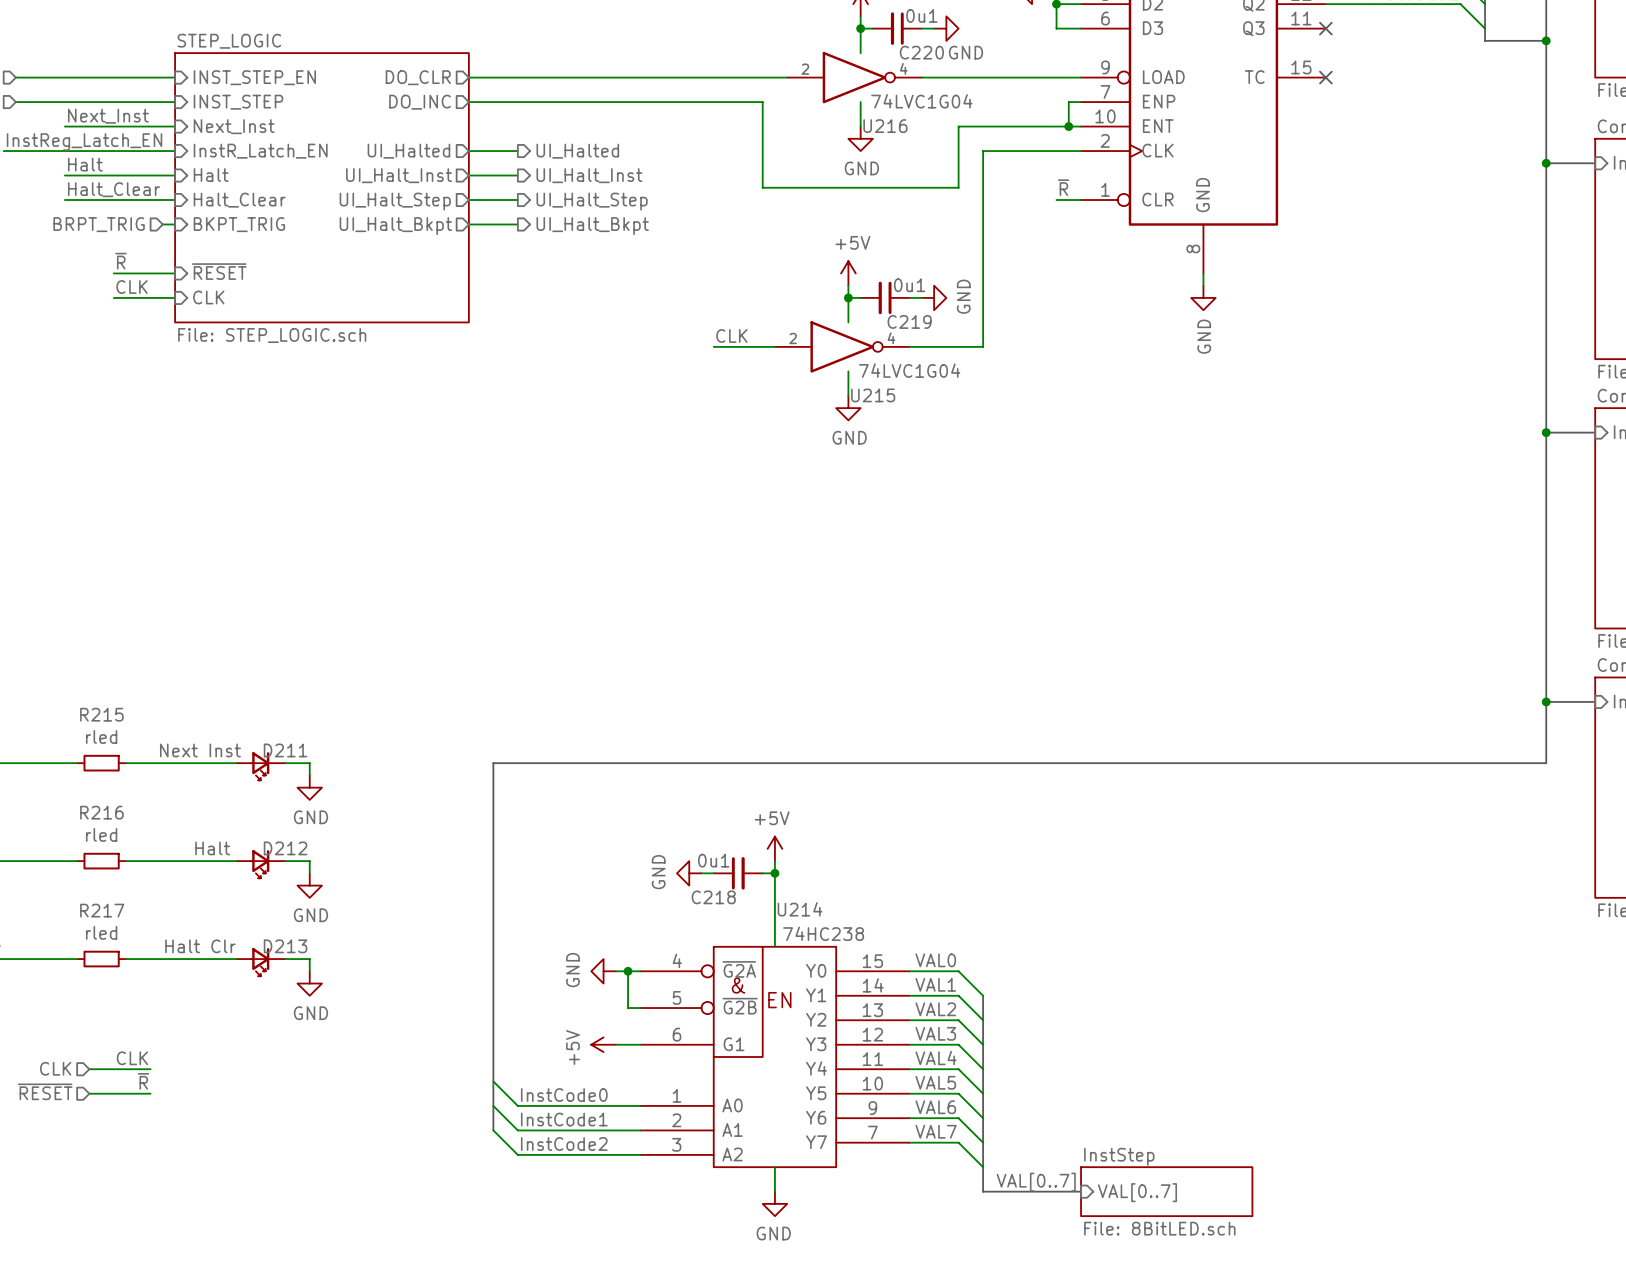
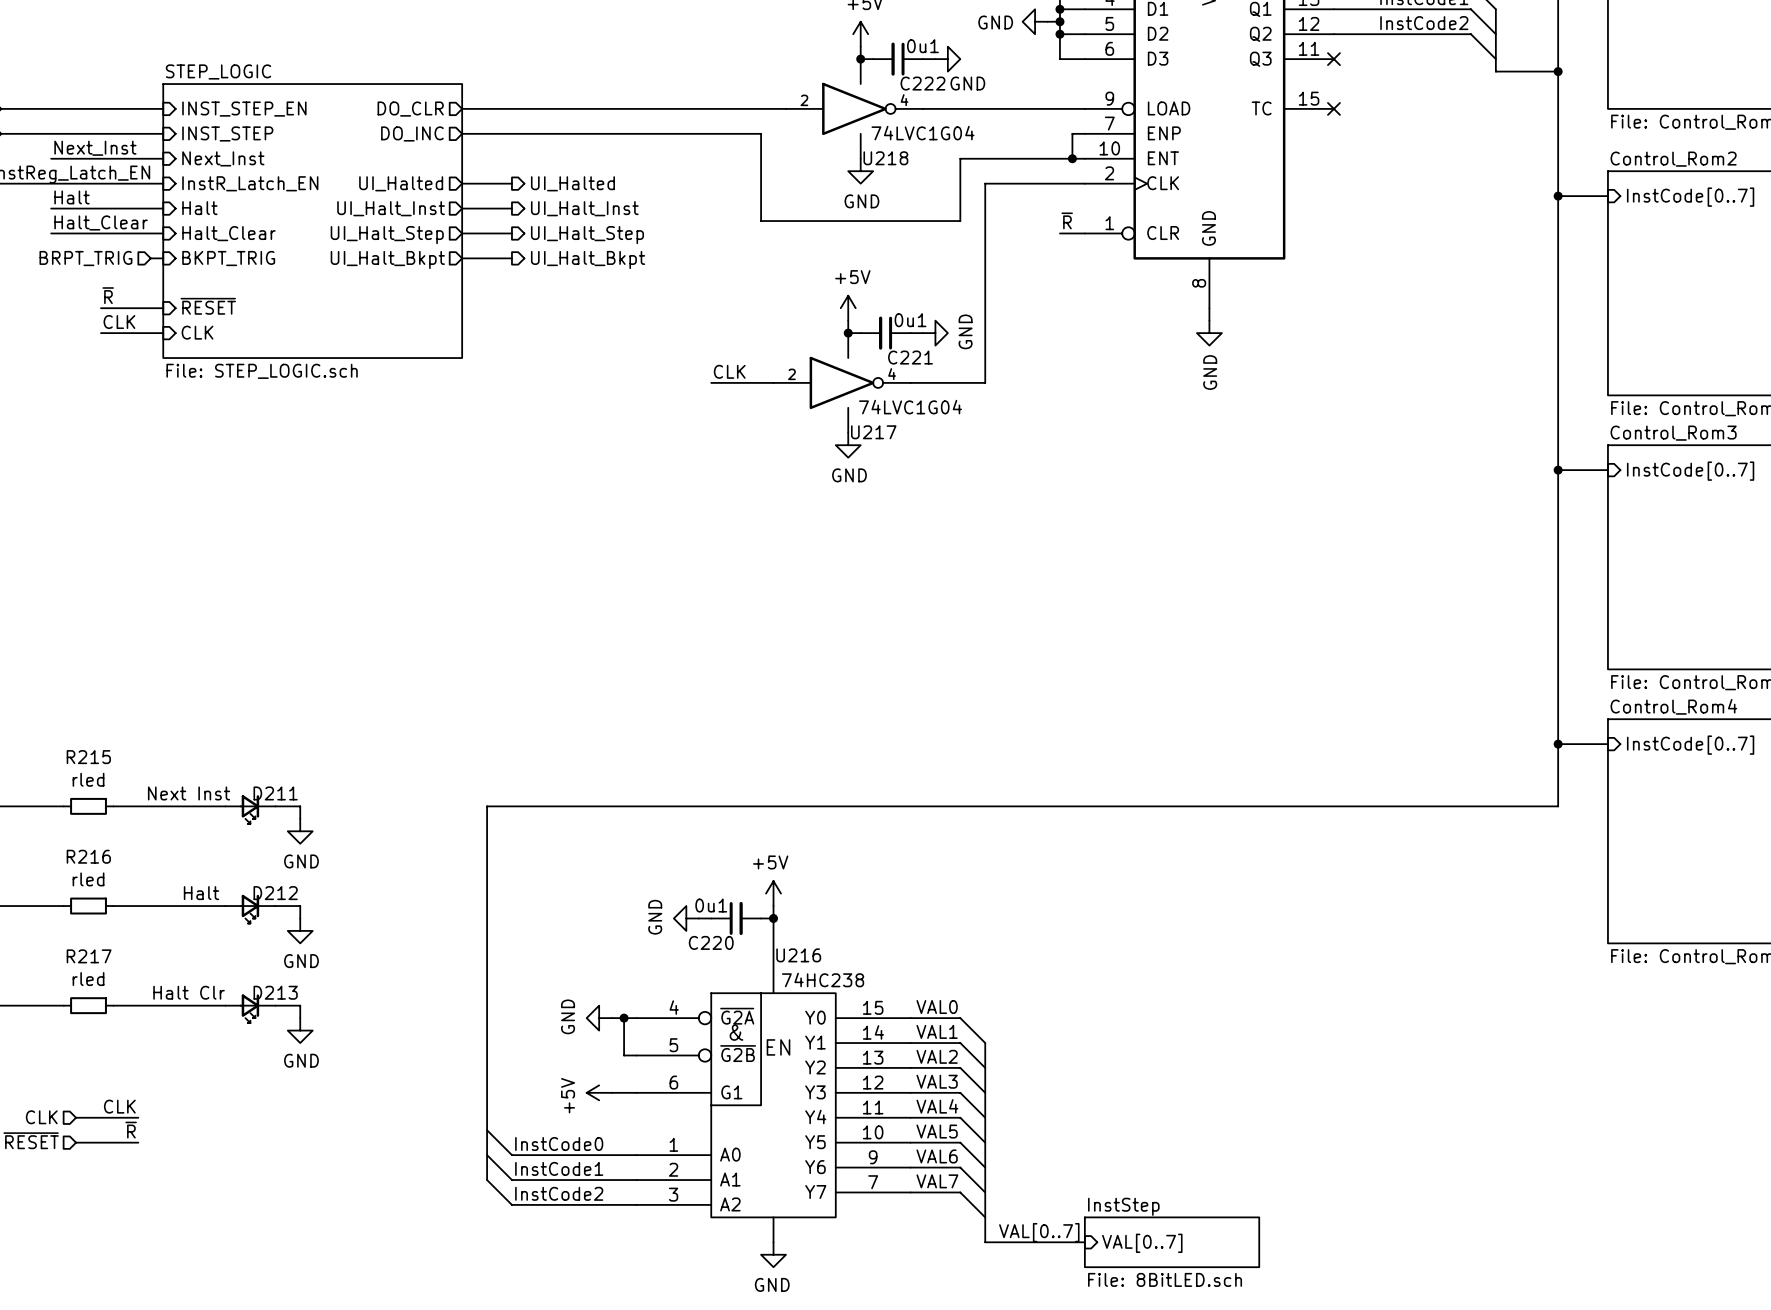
C220 name: C220 (921, 52) -> C222 (922, 83)
U216 name: U216 (885, 126) -> U218 (885, 158)
C219 name: C219 (909, 321) -> C221 (910, 357)
U215 name: U215 (873, 395) -> U217 (873, 432)
C218 name: C218 (713, 897) -> C220 (711, 942)
U214 name: U214 (800, 909) -> U216 (798, 955)

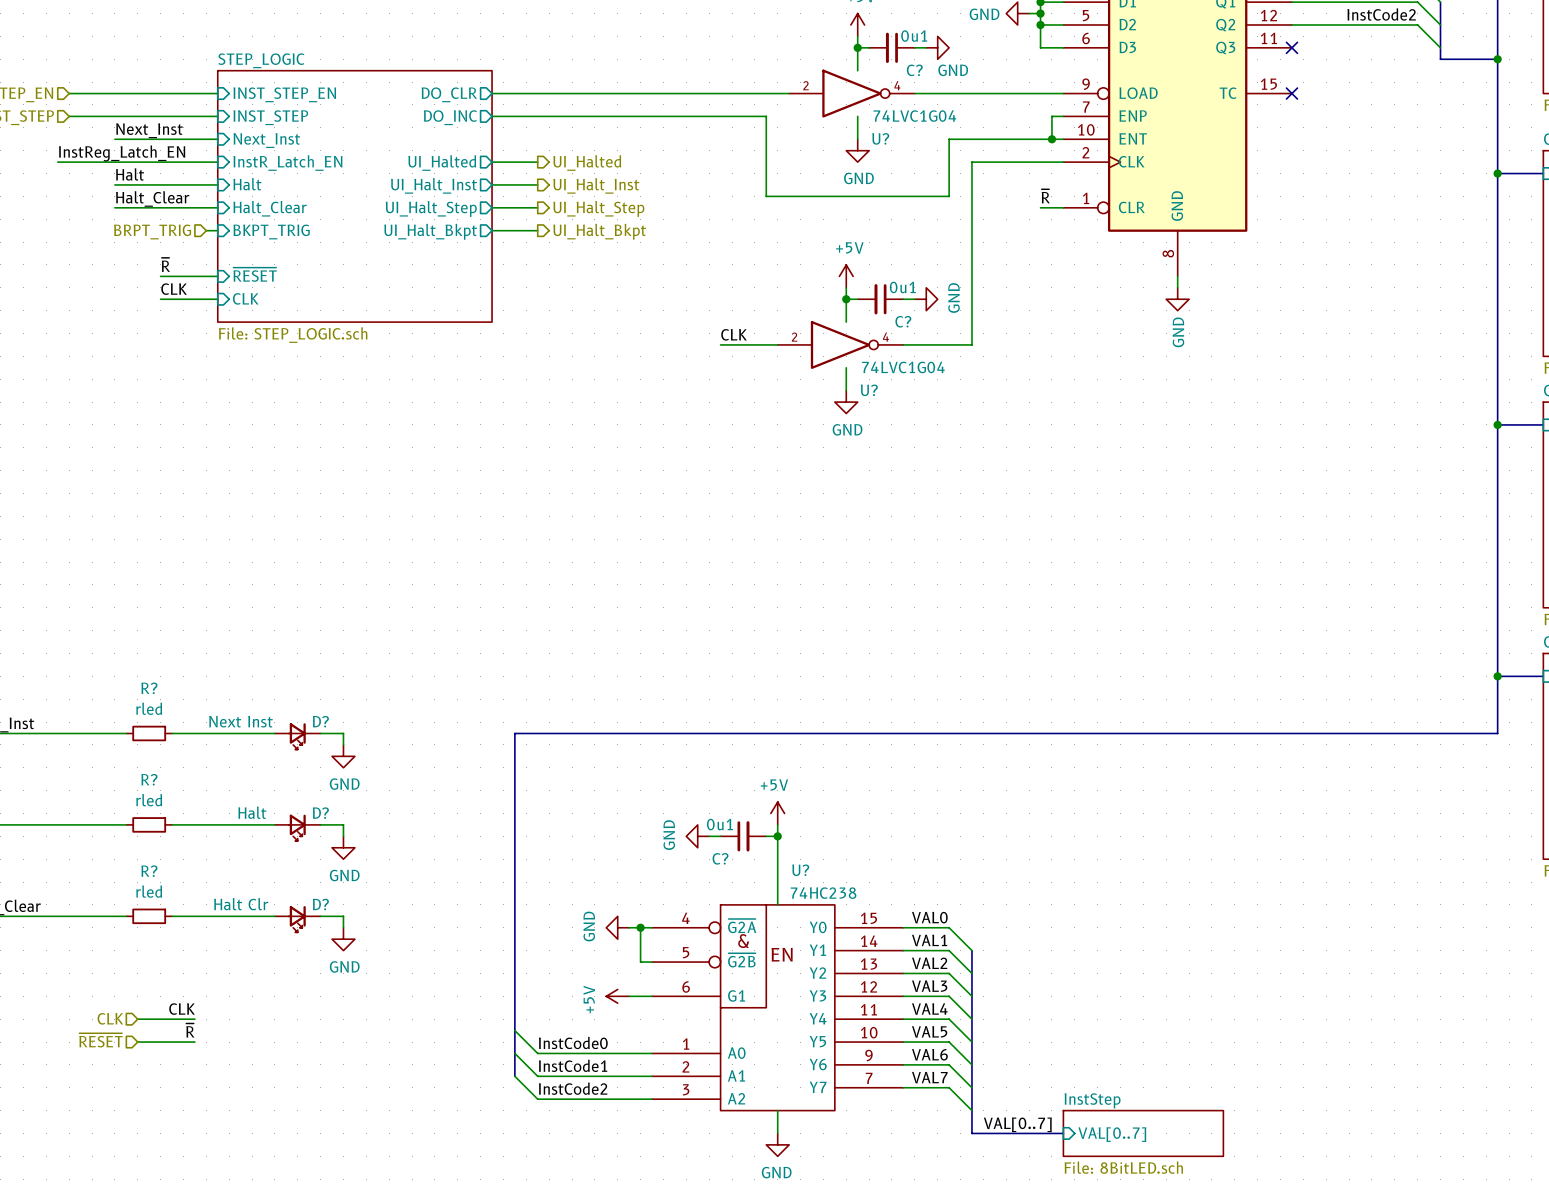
C222 name: C222 (922, 83) -> C? (914, 70)
U218 name: U218 (885, 158) -> U? (880, 138)
C221 name: C221 (910, 357) -> C? (903, 321)
U217 name: U217 (873, 432) -> U? (869, 390)
R215 name: R215 (88, 757) -> R? (149, 688)
D211 name: D211 (275, 793) -> D? (320, 721)
R216 name: R216 (88, 856) -> R? (149, 779)
D212 name: D212 (275, 893) -> D? (320, 813)
C220 name: C220 (711, 942) -> C? (720, 858)
U216 name: U216 (798, 955) -> U? (800, 870)
R217 name: R217 (89, 956) -> R? (149, 871)
D213 name: D213 (275, 992) -> D? (320, 904)

